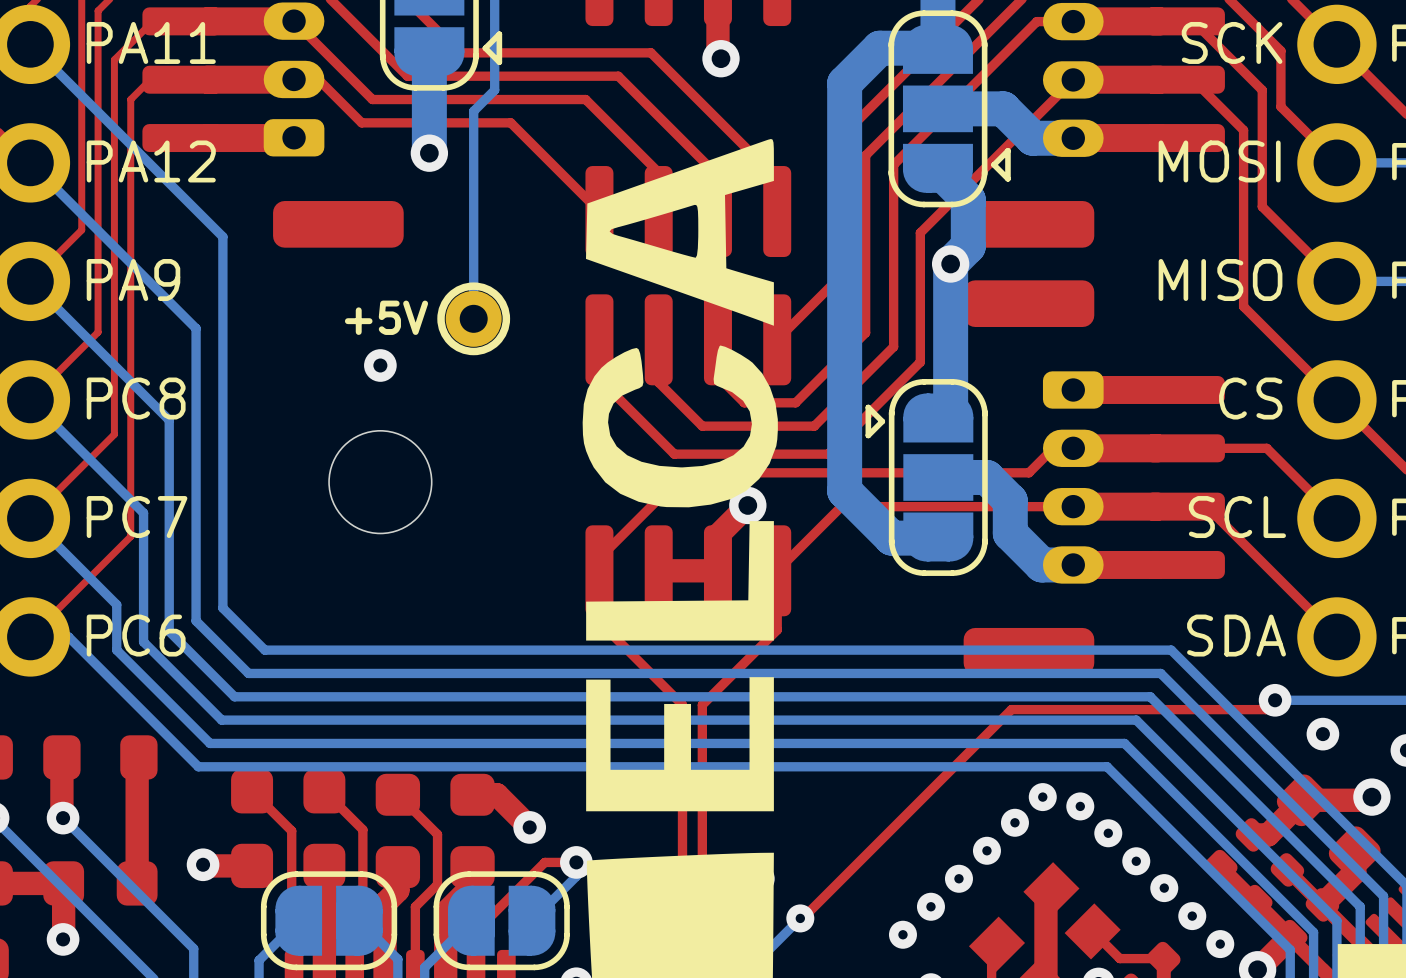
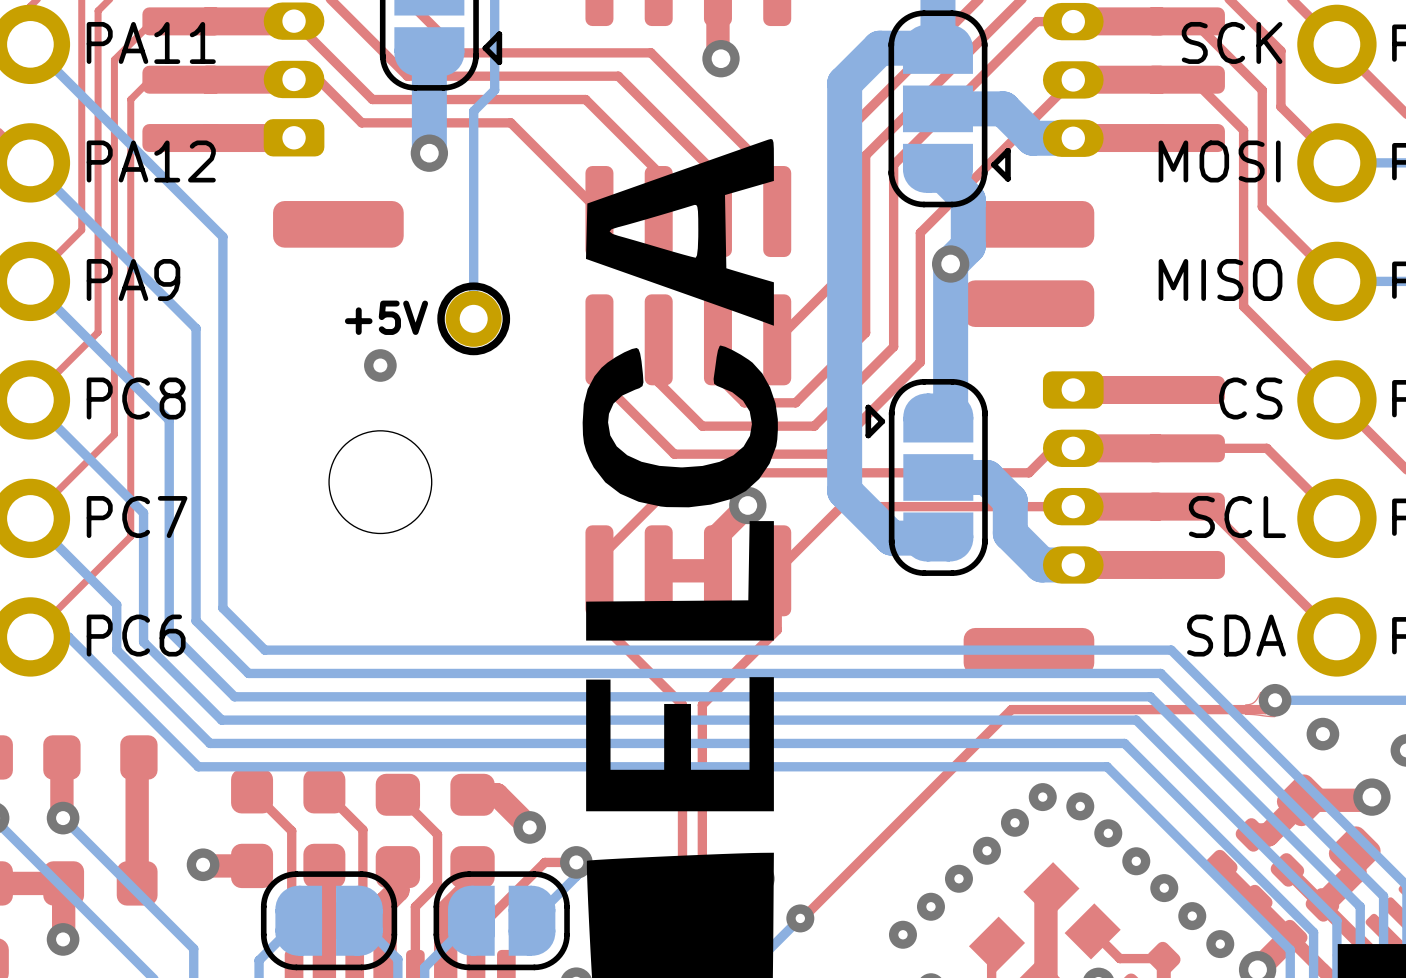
top zone outline: none -> (1260, 692) (1253, 702) (1245, 704) (1245, 714) (1275, 716) (1281, 695) (1260, 692)

